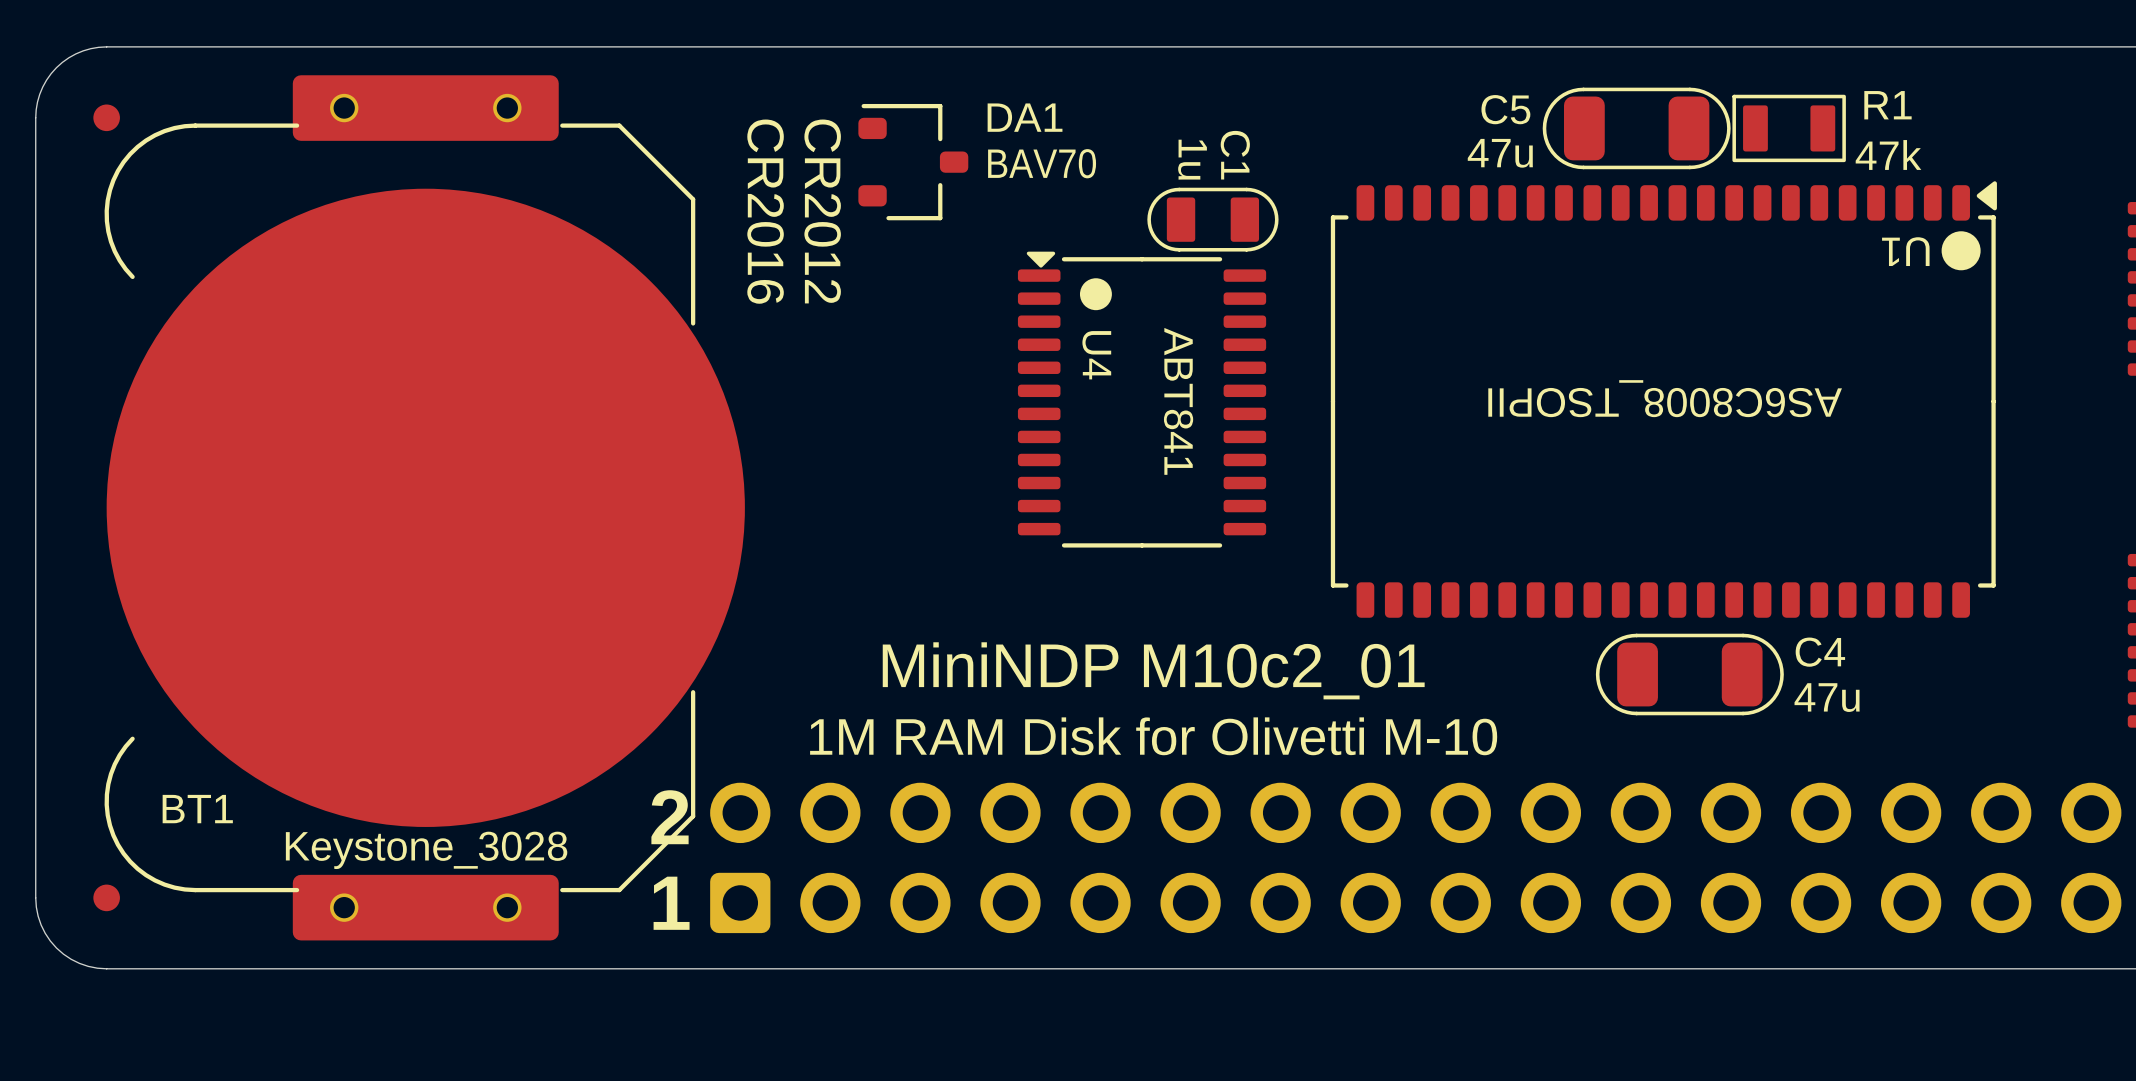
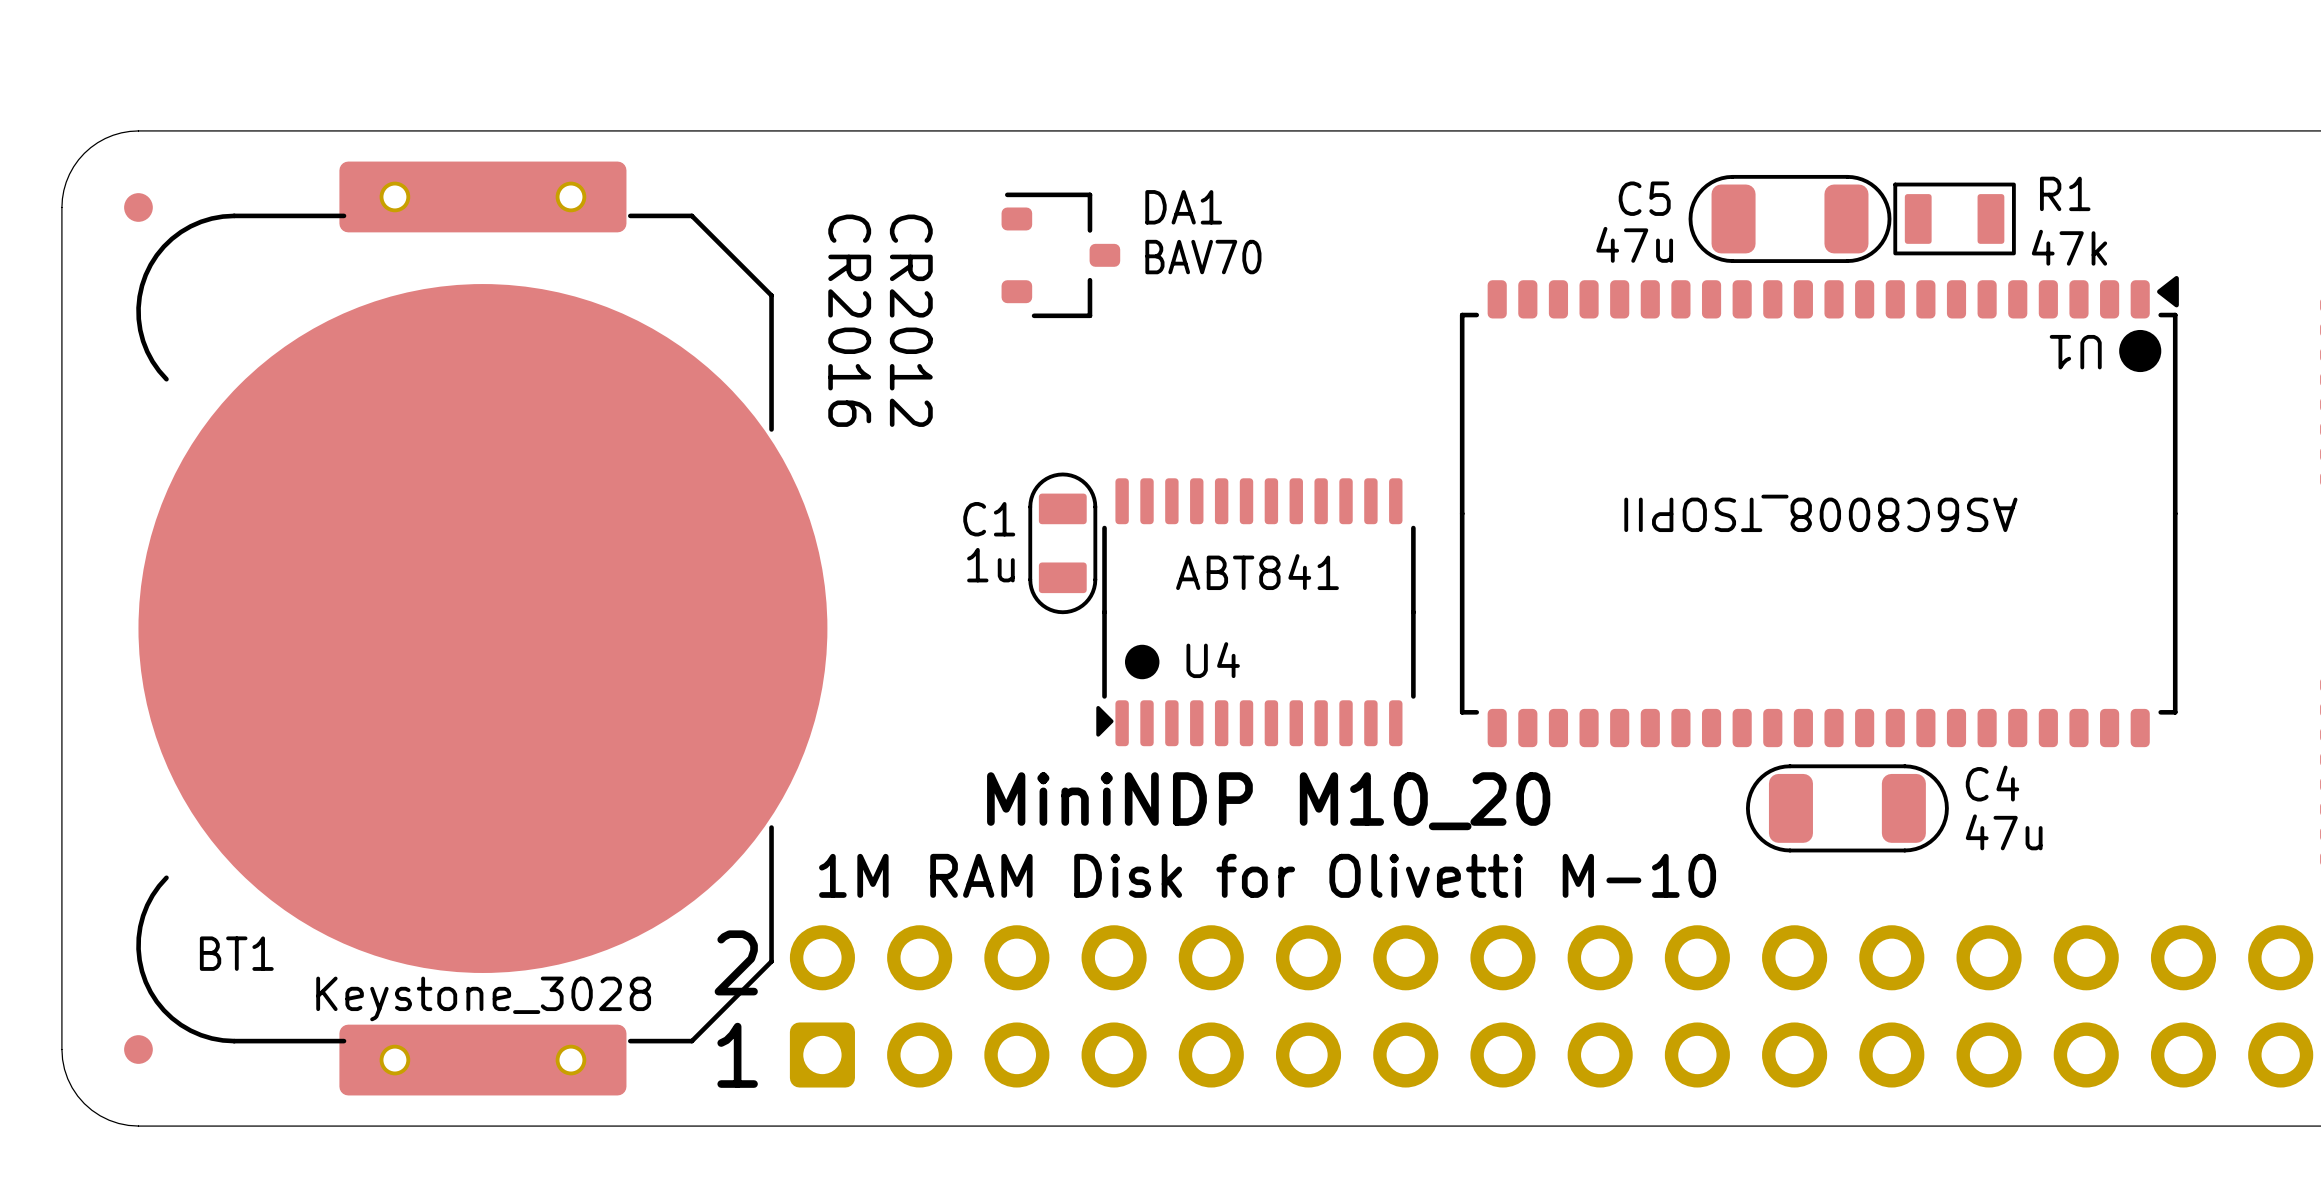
C1 name position: C1 (1235, 155) -> C1 (989, 519)
C1 value position: 1u (1192, 159) -> 1u (990, 565)
DA1 position: (913, 162) -> (1060, 255)
C1 rotation: 0° (1212, 219) -> 90° clockwise (1062, 543)
C1 position: (1212, 219) -> (1062, 543)
U4 rotation: 0° (1142, 399) -> 90° counterclockwise (1255, 612)
text: MiniNDP M10c2_01 (1153, 670) -> MiniNDP M10_20 (1268, 801)

